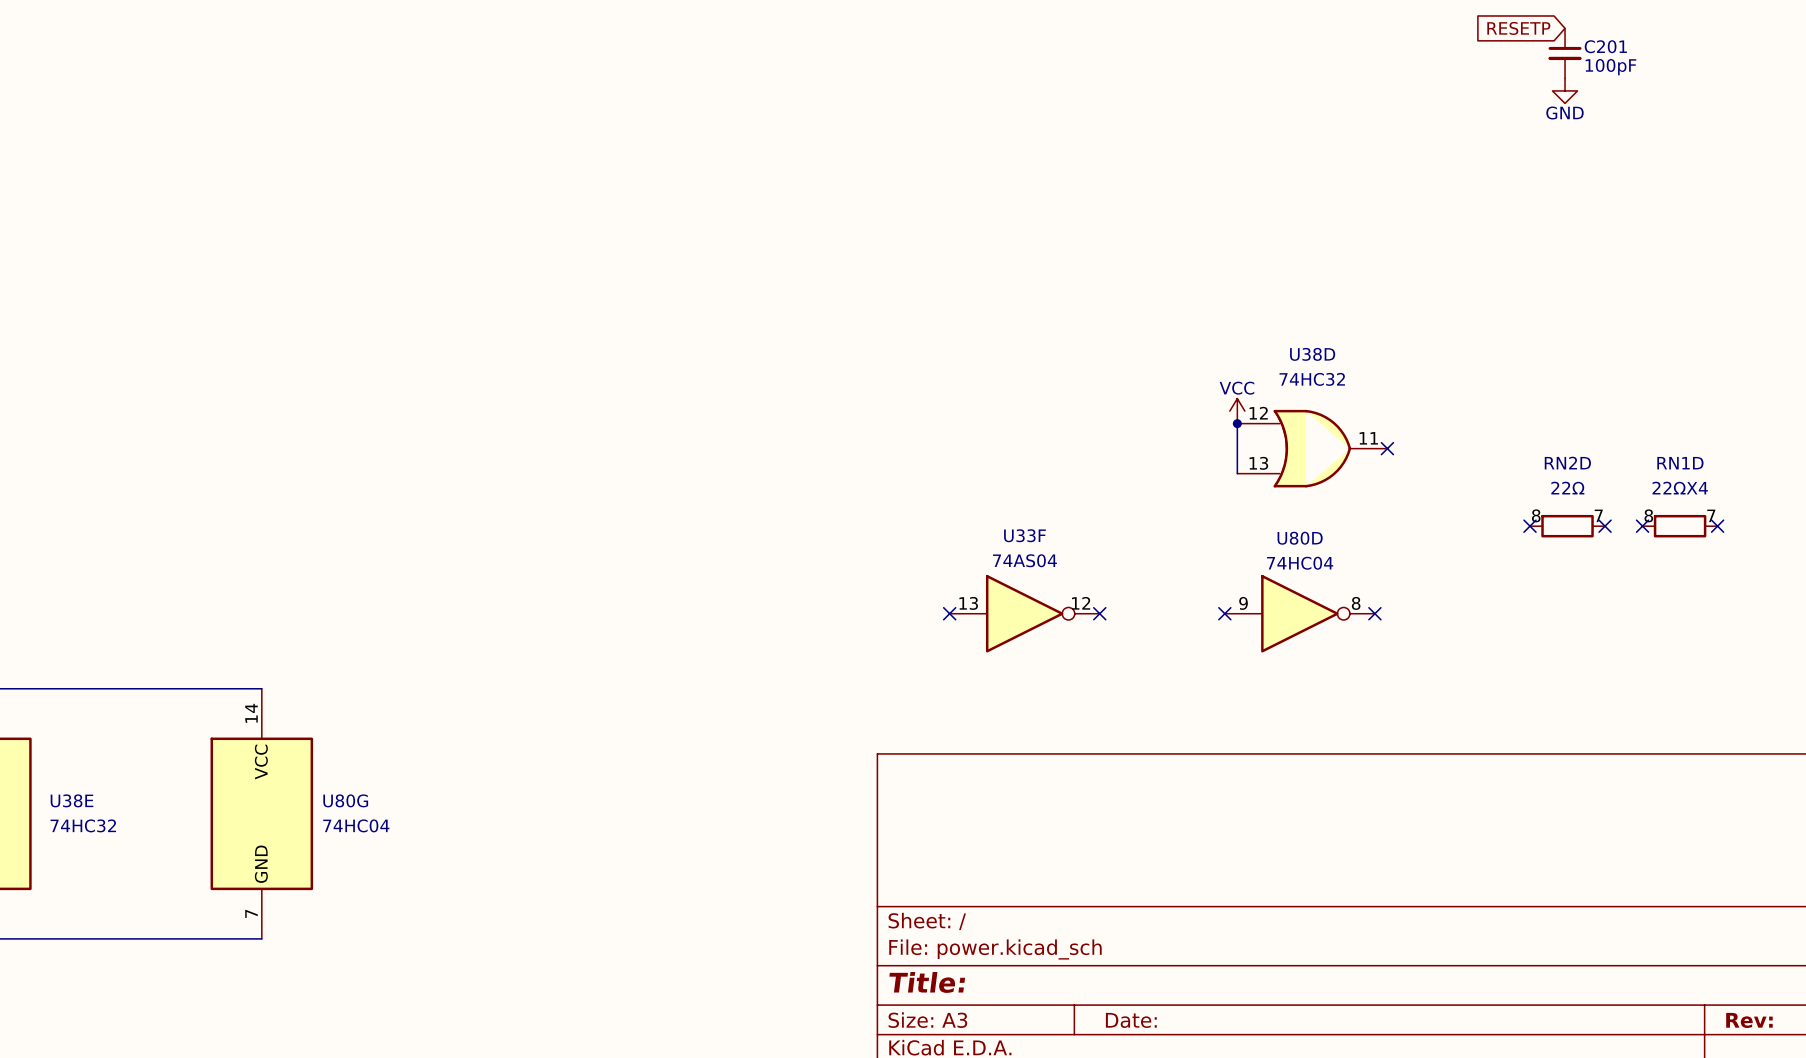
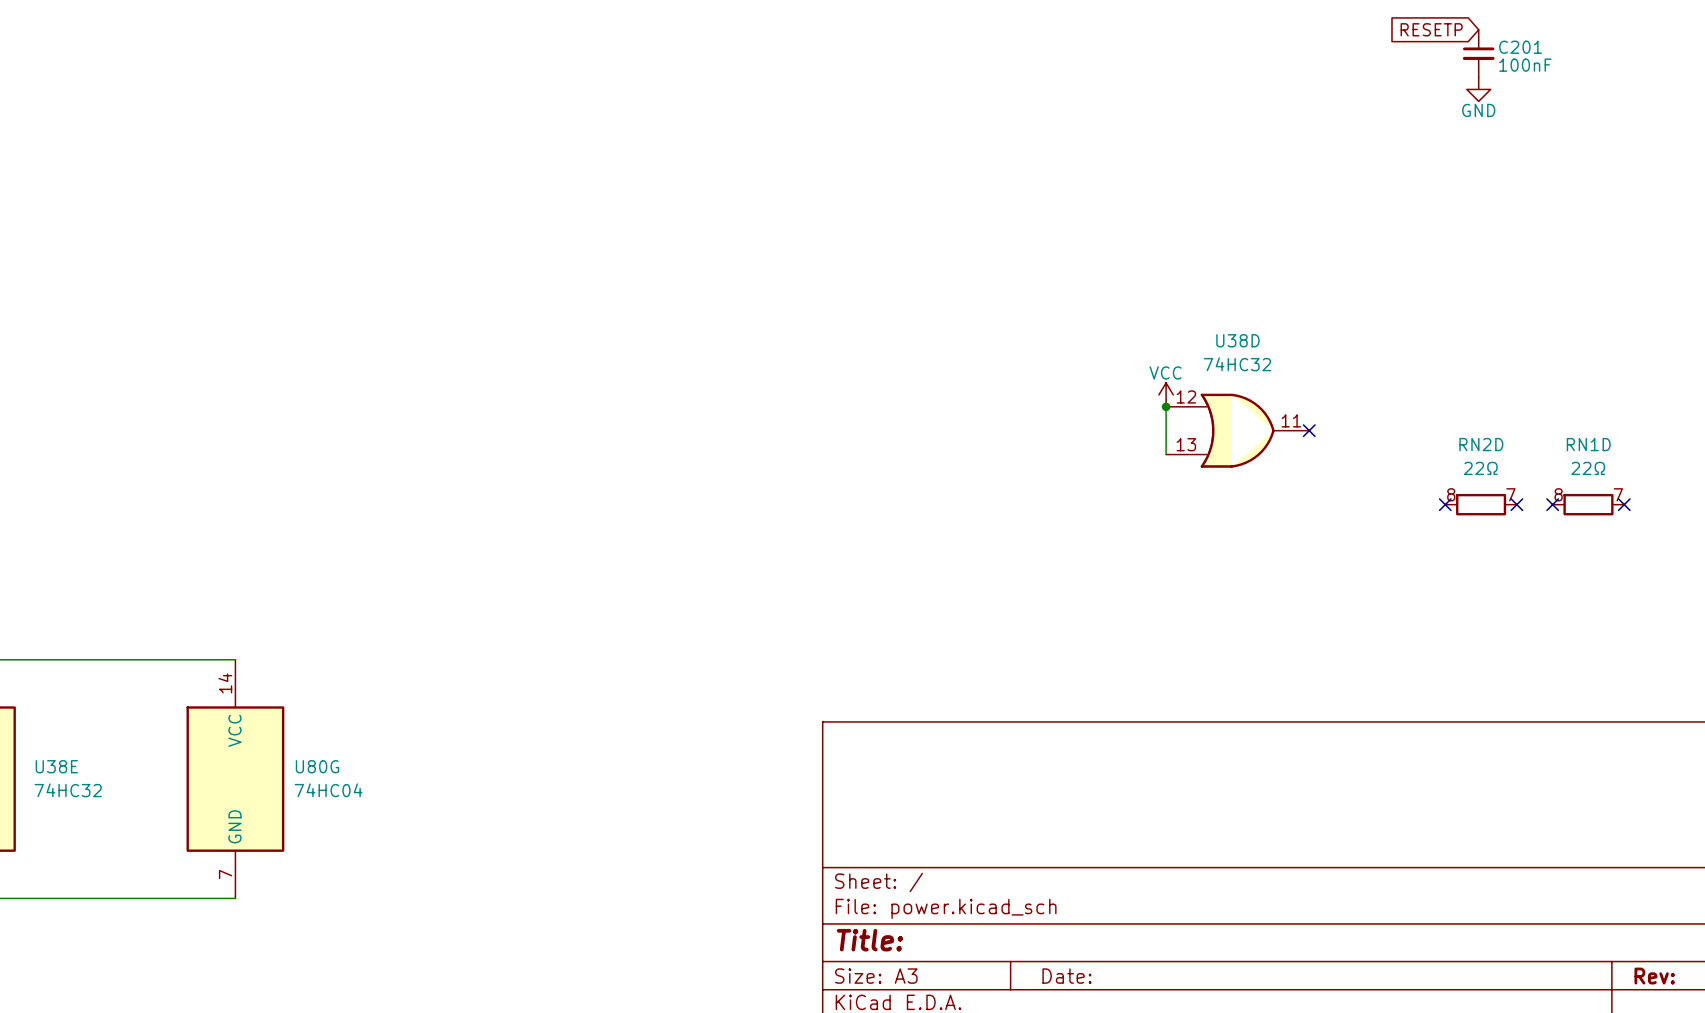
C201 value: 100pF (1610, 67) -> 100nF (1525, 65)
RN1D value: 22ΩX4 (1680, 488) -> 22Ω (1588, 468)
no-connect mark: (949, 613) -> none
U33F: 74AS04 (1024, 613) -> none
no-connect mark: (1099, 613) -> none
no-connect mark: (1224, 613) -> none
U80D: 74HC04 (1299, 613) -> none
no-connect mark: (1374, 613) -> none

